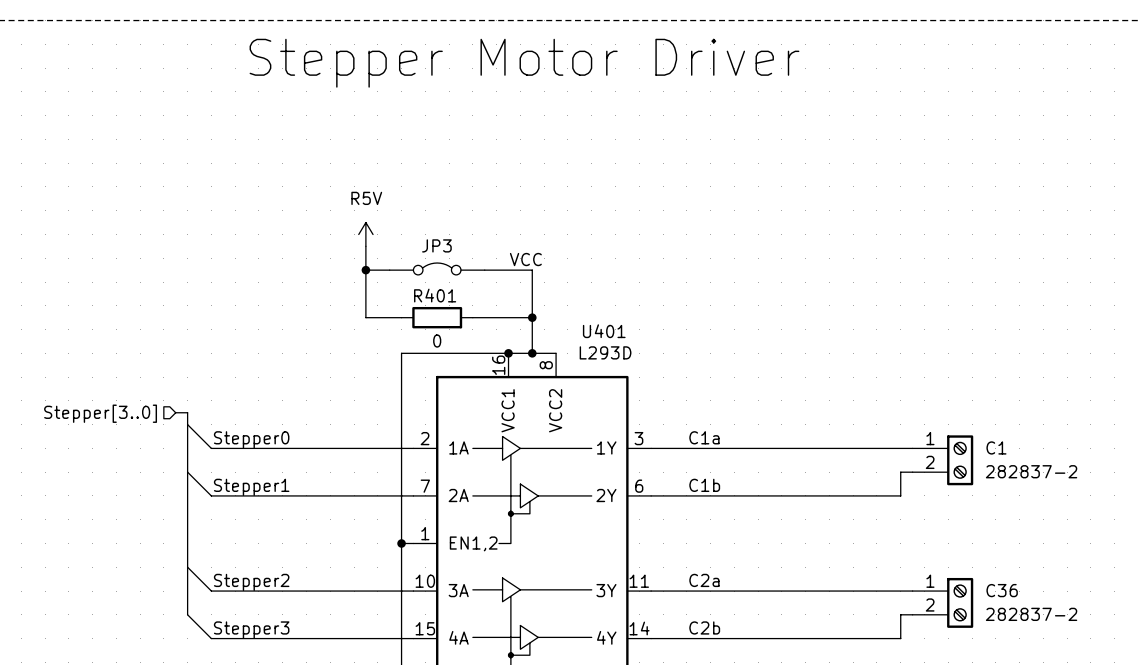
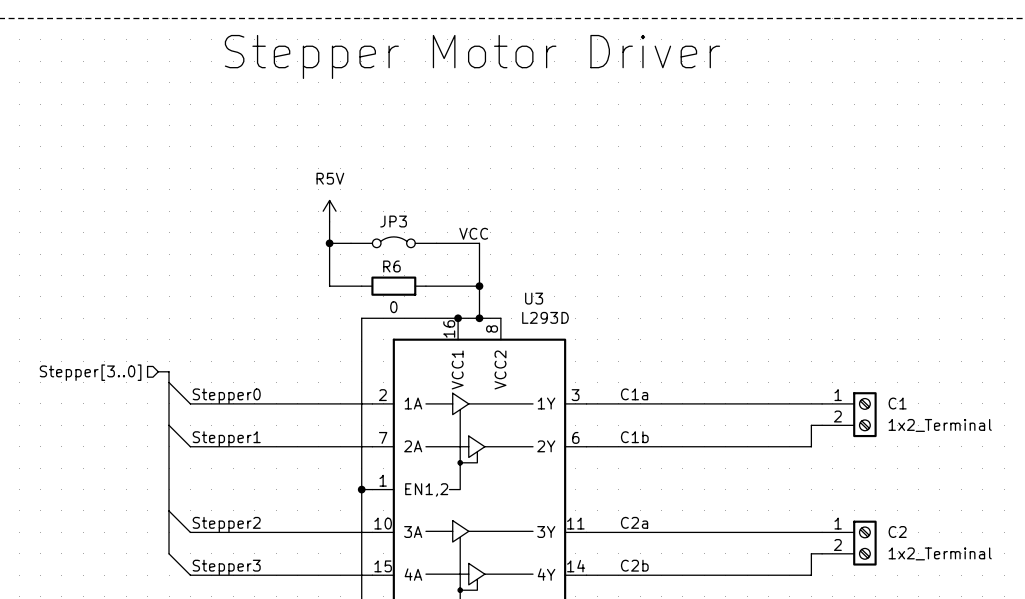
R401 name: R401 (435, 295) -> R6 (391, 266)
U401 name: U401 (604, 331) -> U3 (534, 298)
C1 value: 282837-2 (1031, 471) -> 1x2_Terminal (940, 425)
C36 name: C36 (1002, 590) -> C2 (897, 532)
C36 value: 282837-2 (1031, 614) -> 1x2_Terminal (940, 553)

